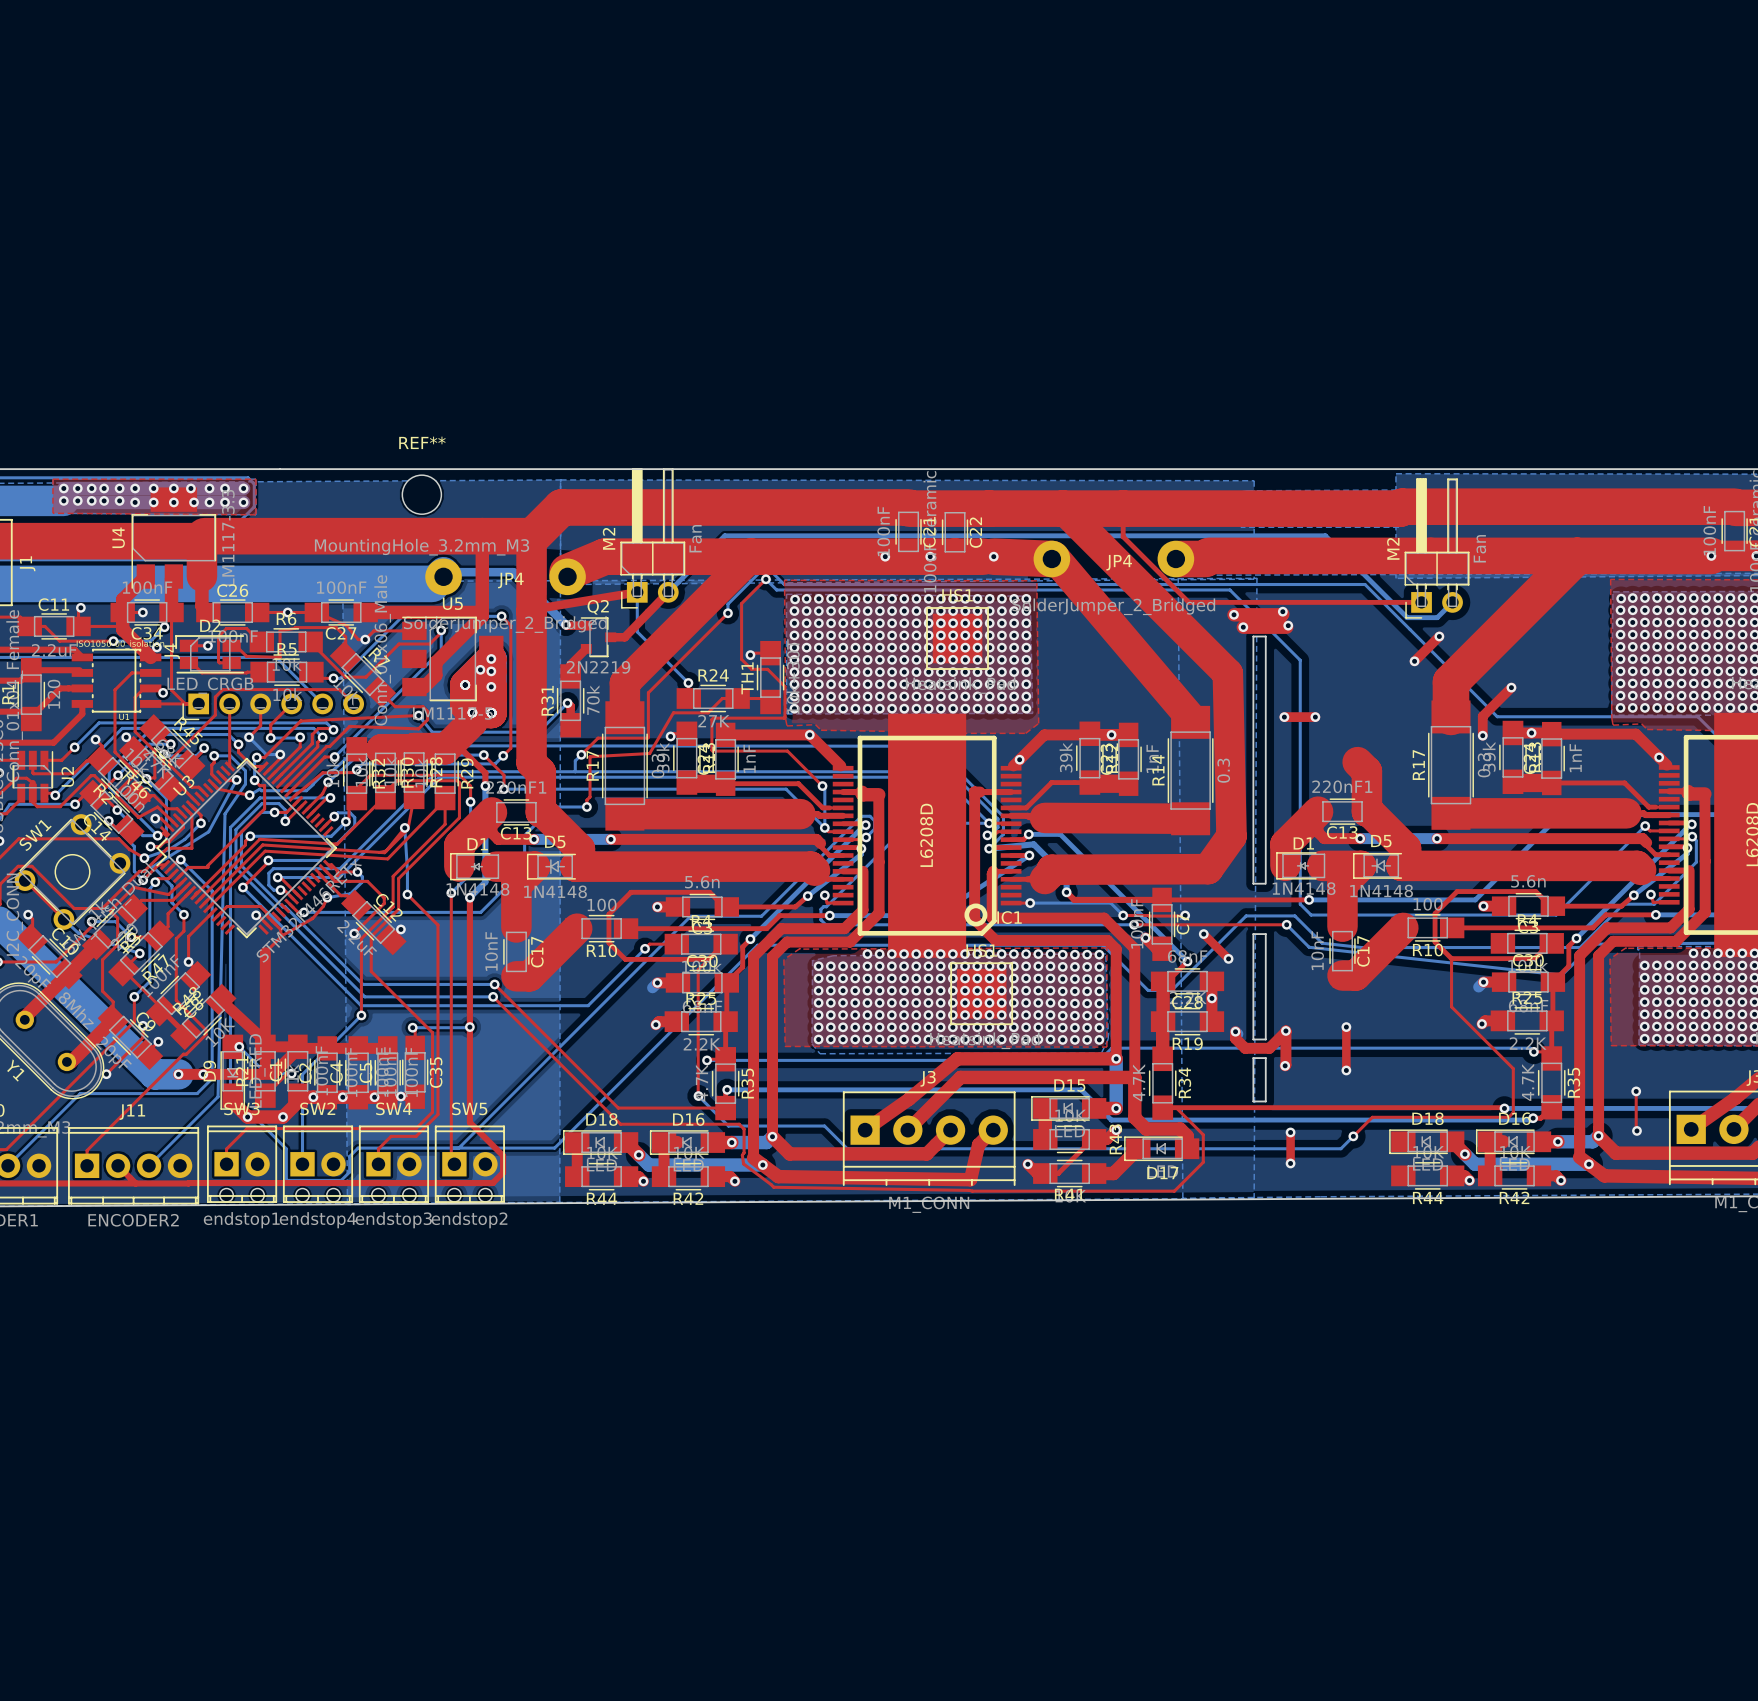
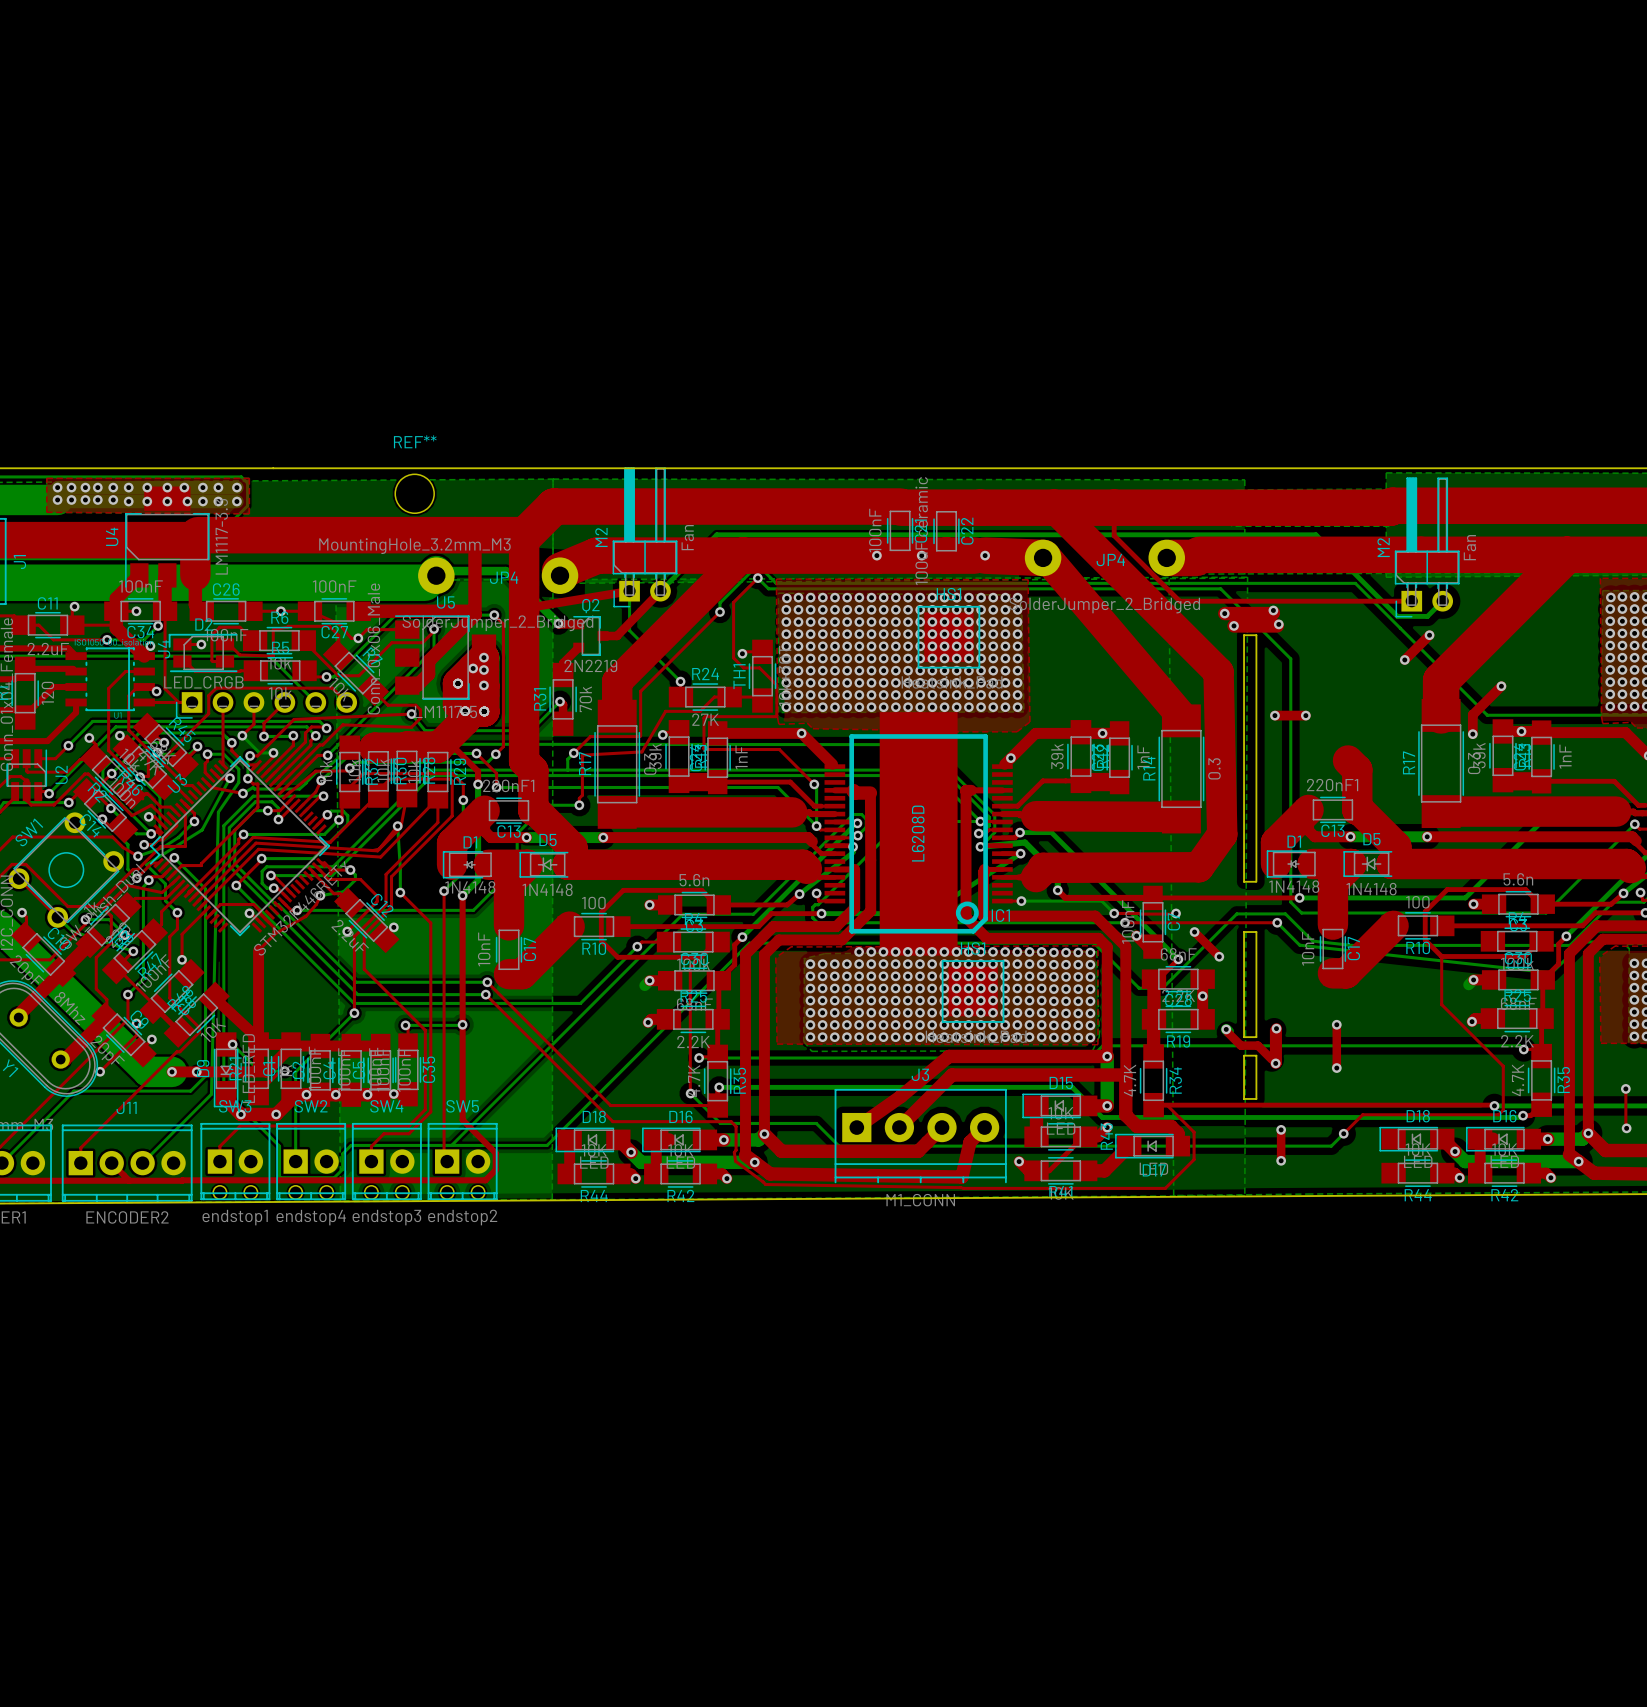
top track: (1235, 1031) (1235, 1038) (1245, 1048) (1269, 1048) (1285, 1031) -> none
top track: none -> (1274, 1030) (1274, 1057) (1271, 1059) (1257, 1045) (1240, 1045) (1227, 1032)

